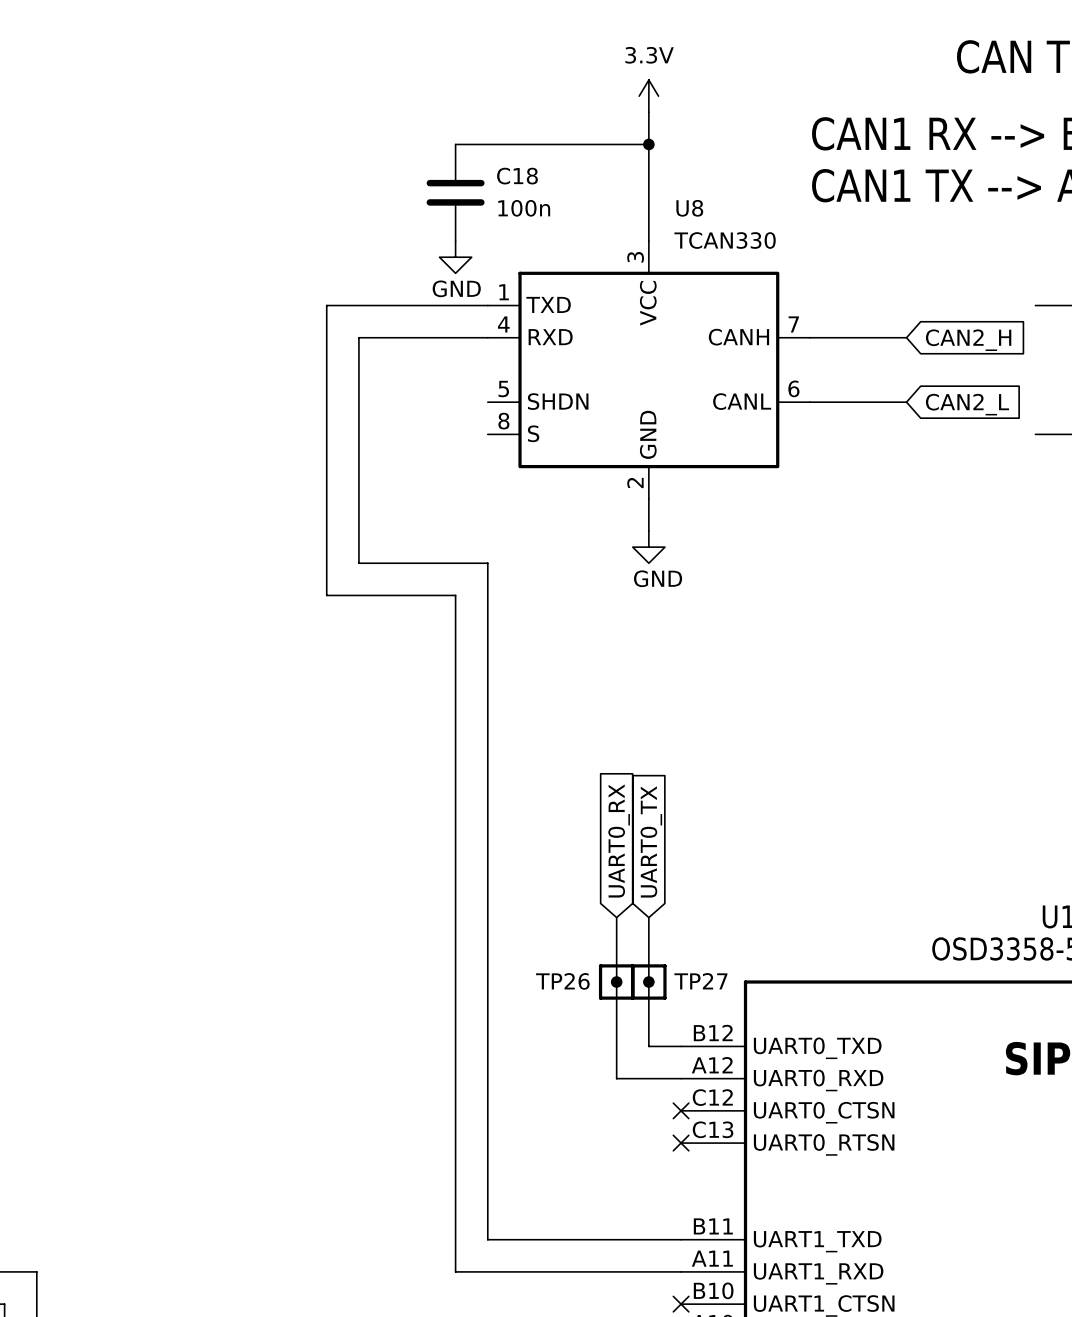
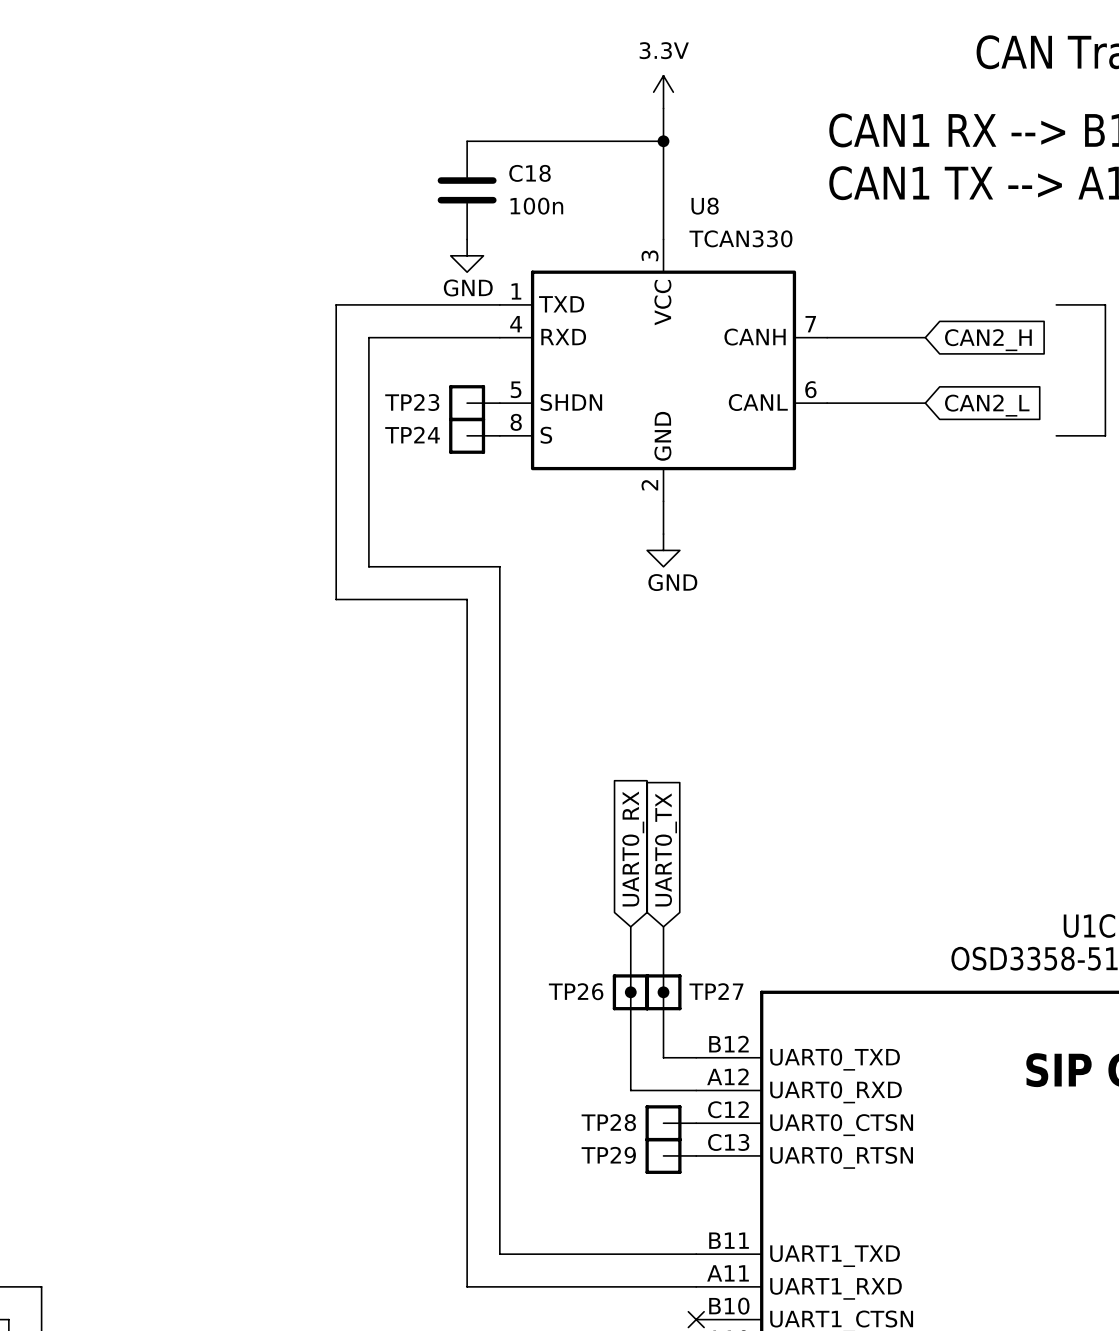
wire: none -> (467, 403) (499, 403)
TP23: none -> (467, 403)
wire: none -> (467, 435) (499, 435)
TP24: none -> (467, 435)
wire: none -> (663, 1123) (696, 1123)
TP28: none -> (663, 1123)
no-connect mark: (681, 1110) -> none
wire: none -> (663, 1155) (696, 1155)
TP29: none -> (663, 1155)
no-connect mark: (681, 1143) -> none

